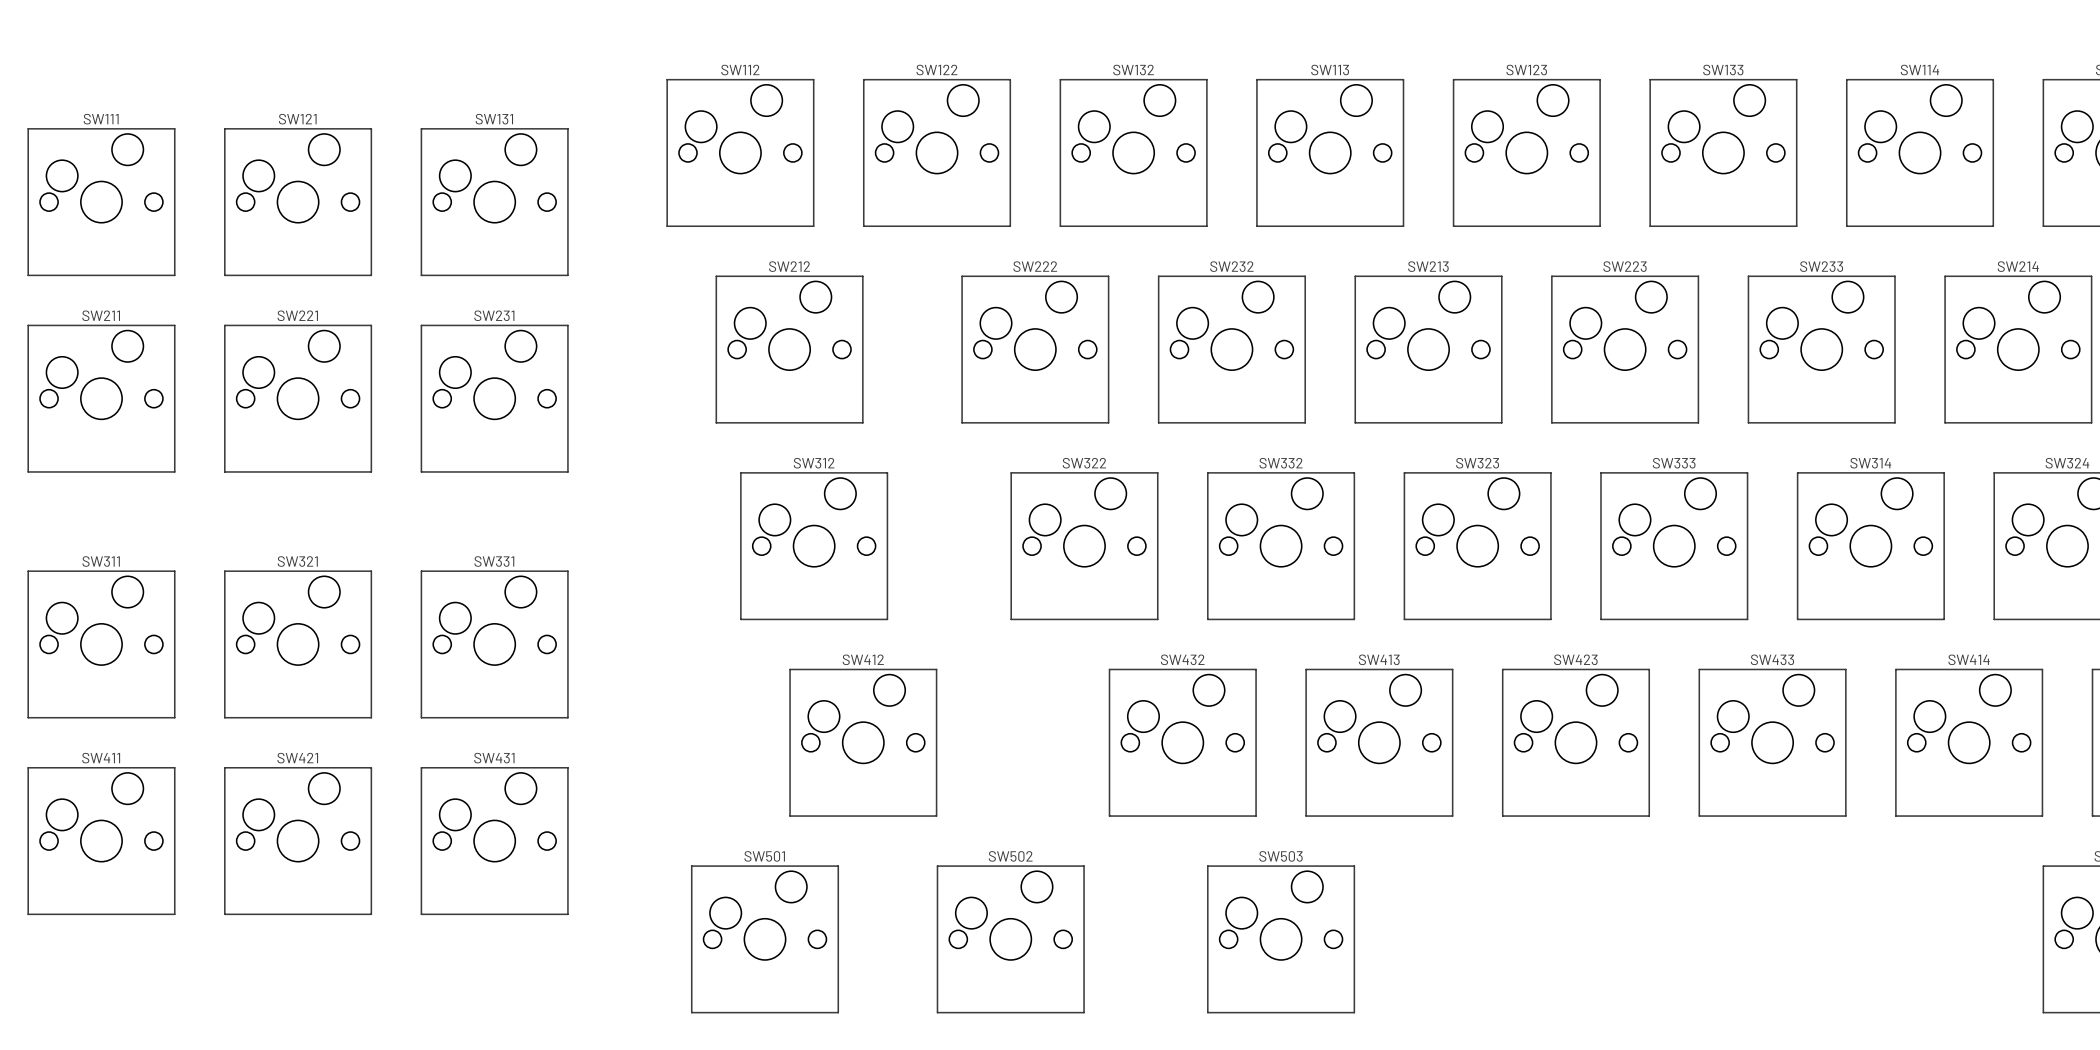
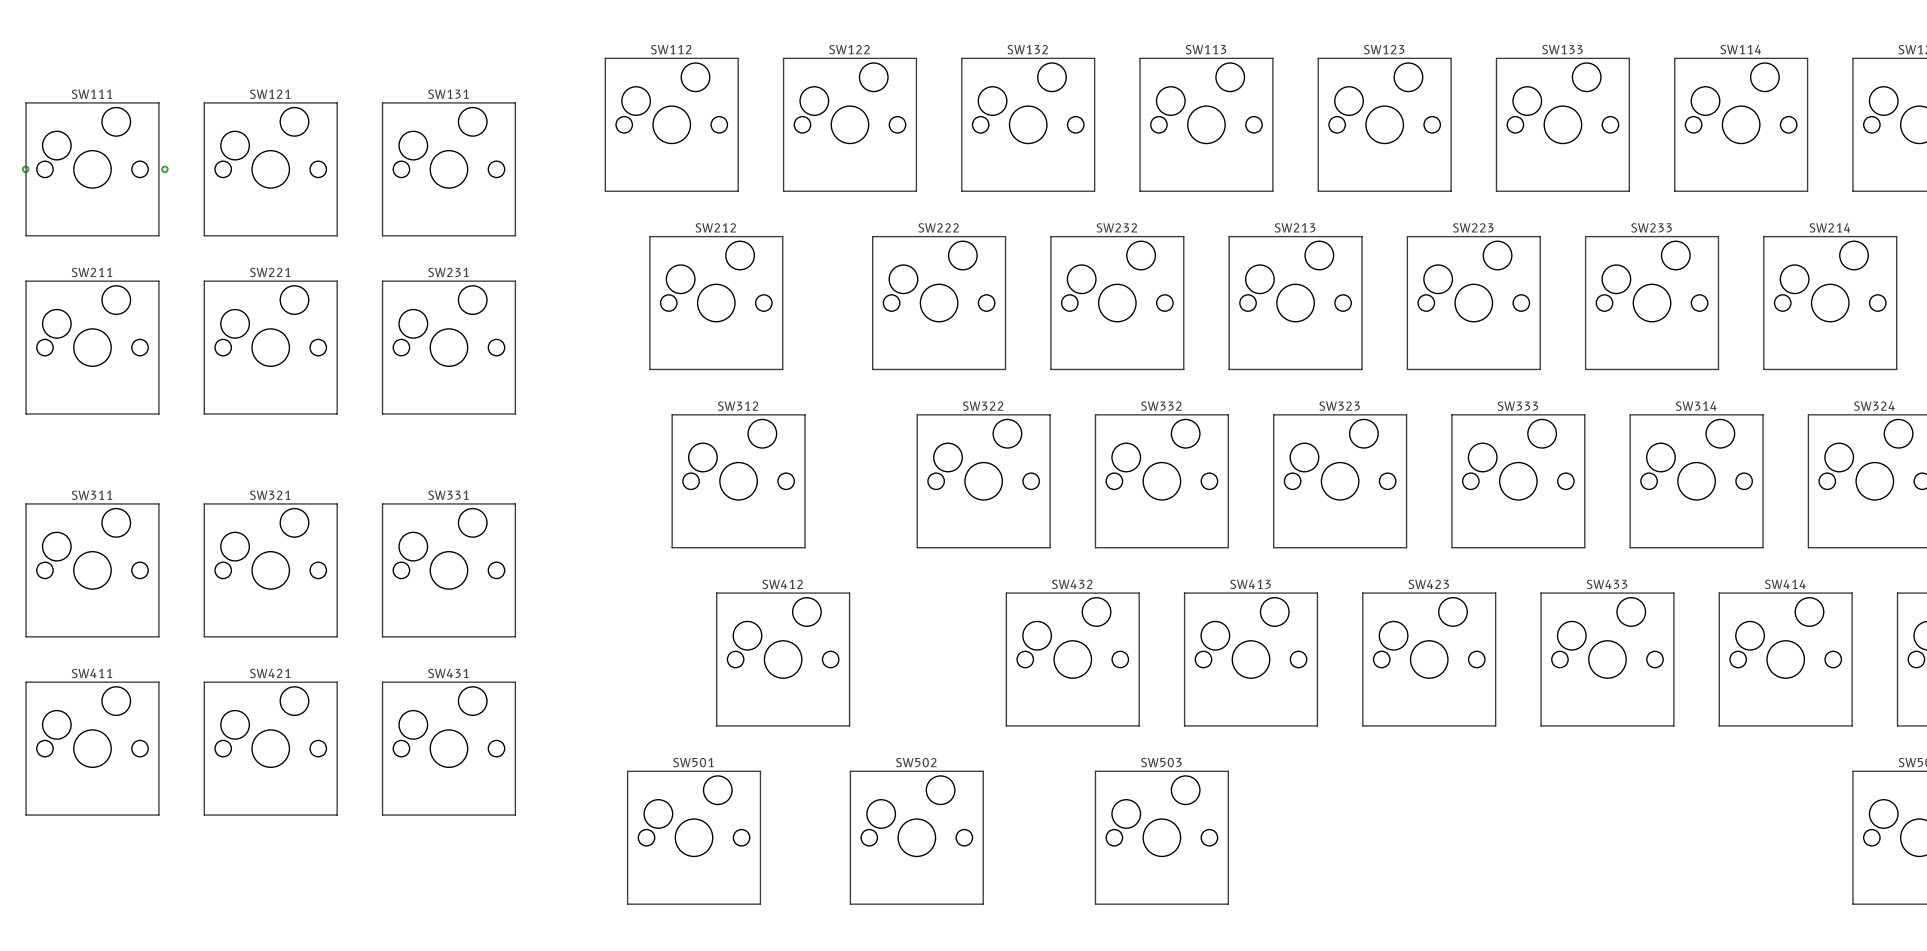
via: none -> (25, 169)
via: none -> (164, 169)

